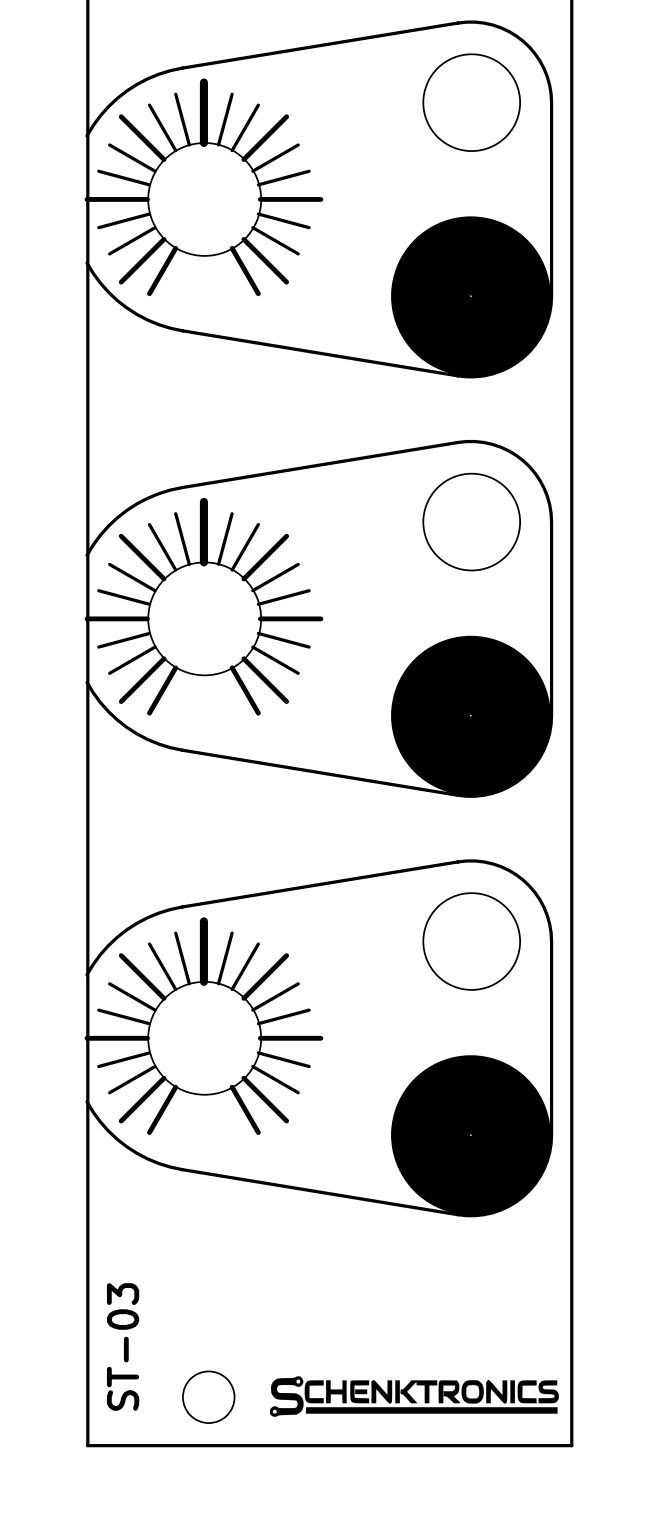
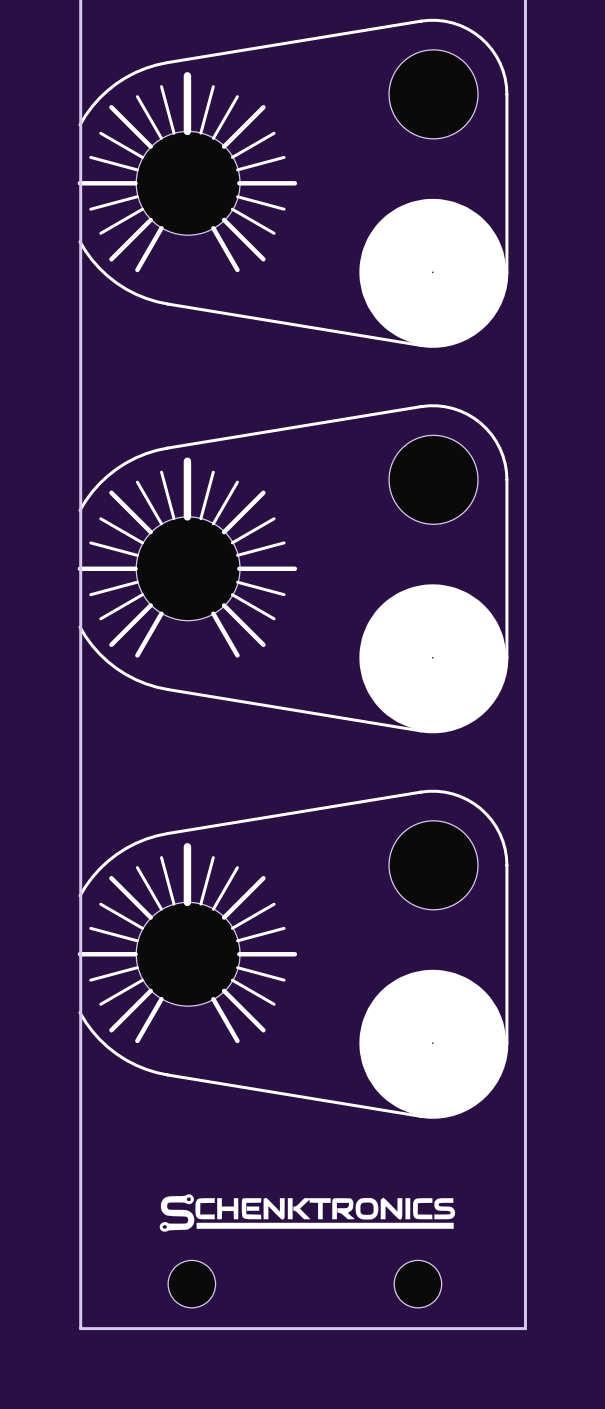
drawing: none -> [159, 1194, 456, 1232]
text: ST-03 (123, 1346) -> none
drawing: [269, 1376, 559, 1417] -> none
part: none -> (417, 1284)

